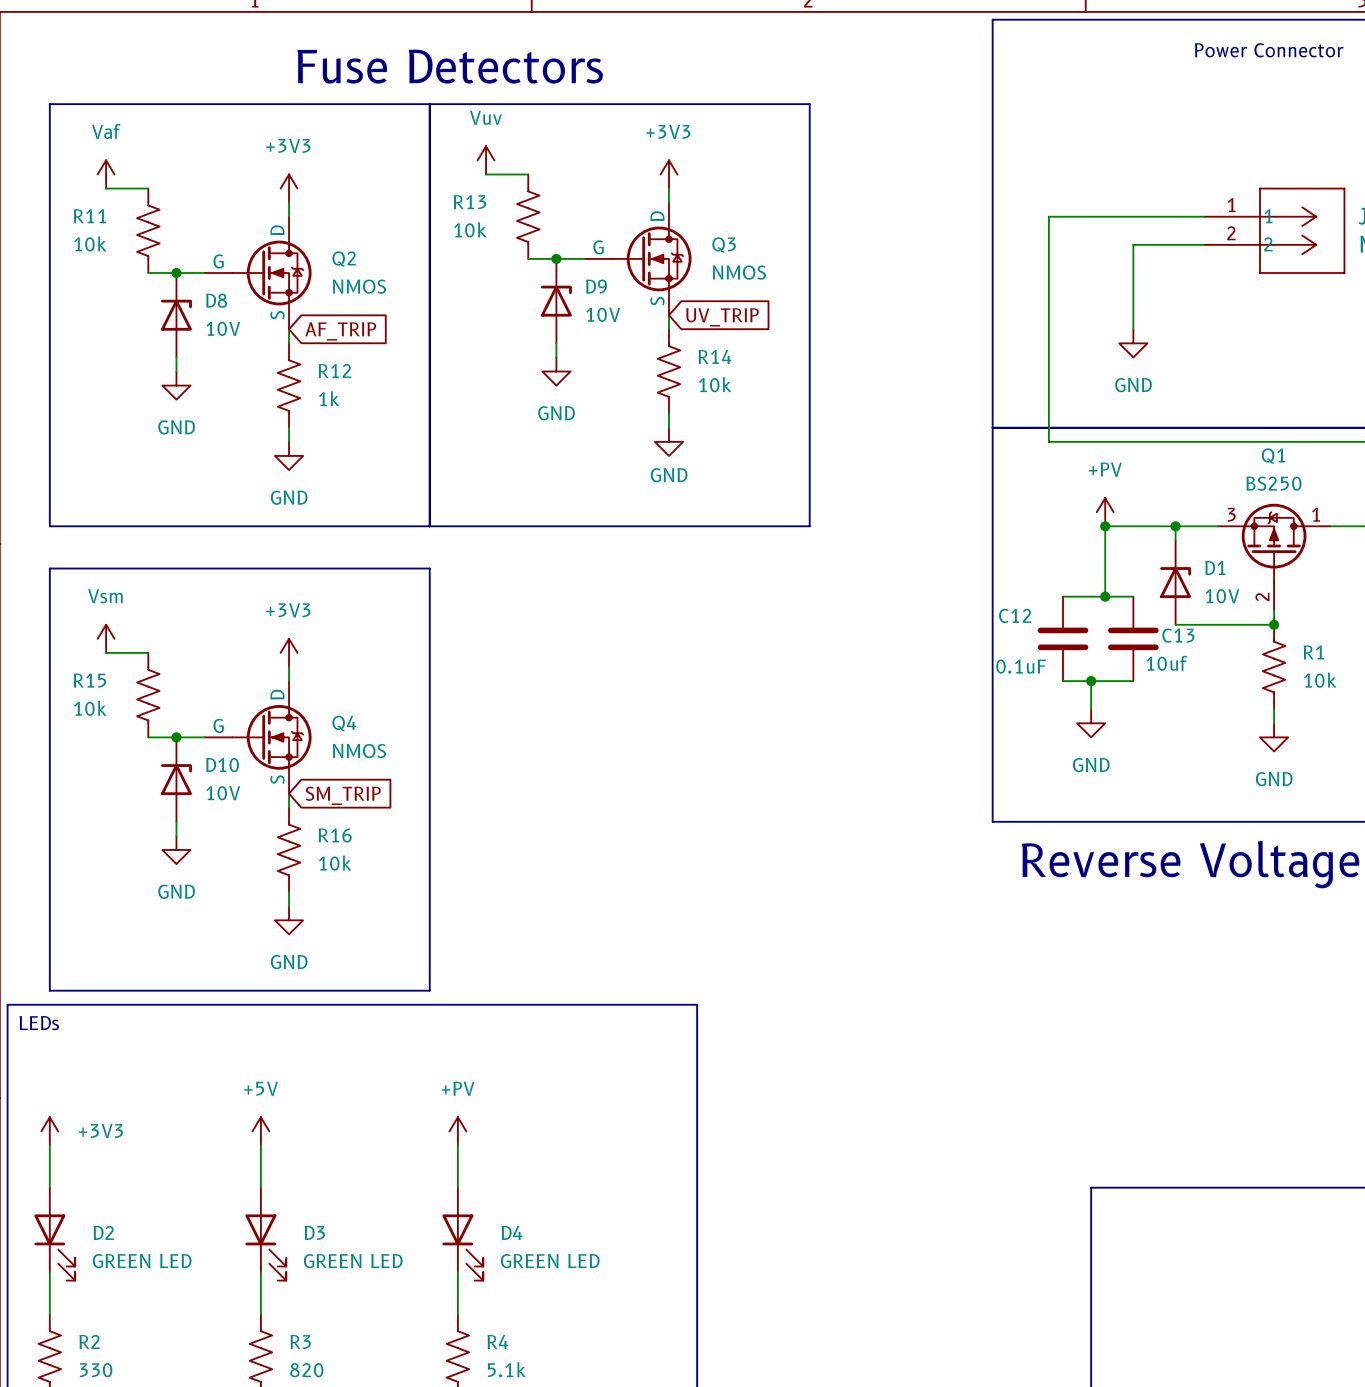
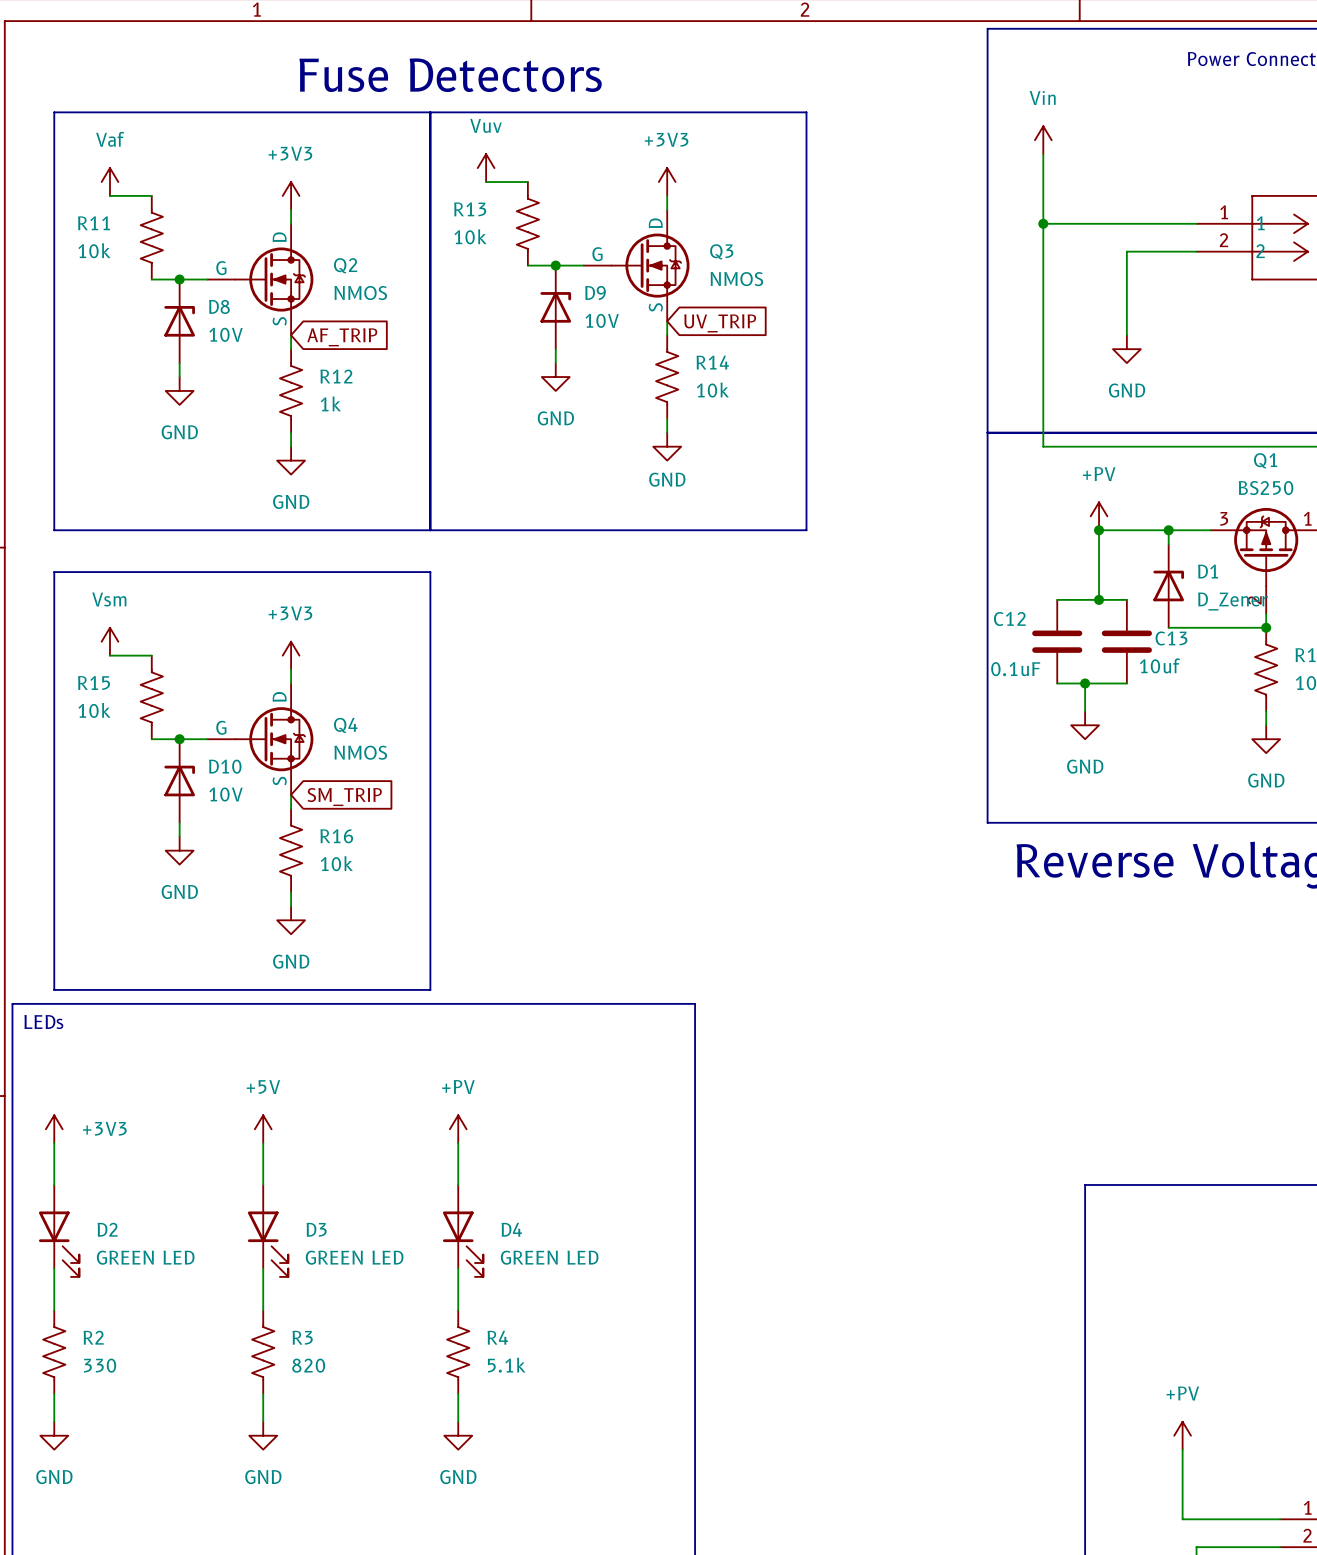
power symbol: none -> Vin (1043, 140)
wire: none -> (1043, 154) (1043, 223)
junction: none -> (1043, 223)
D1 value: 10V (1222, 596) -> D_Zener (1233, 601)

